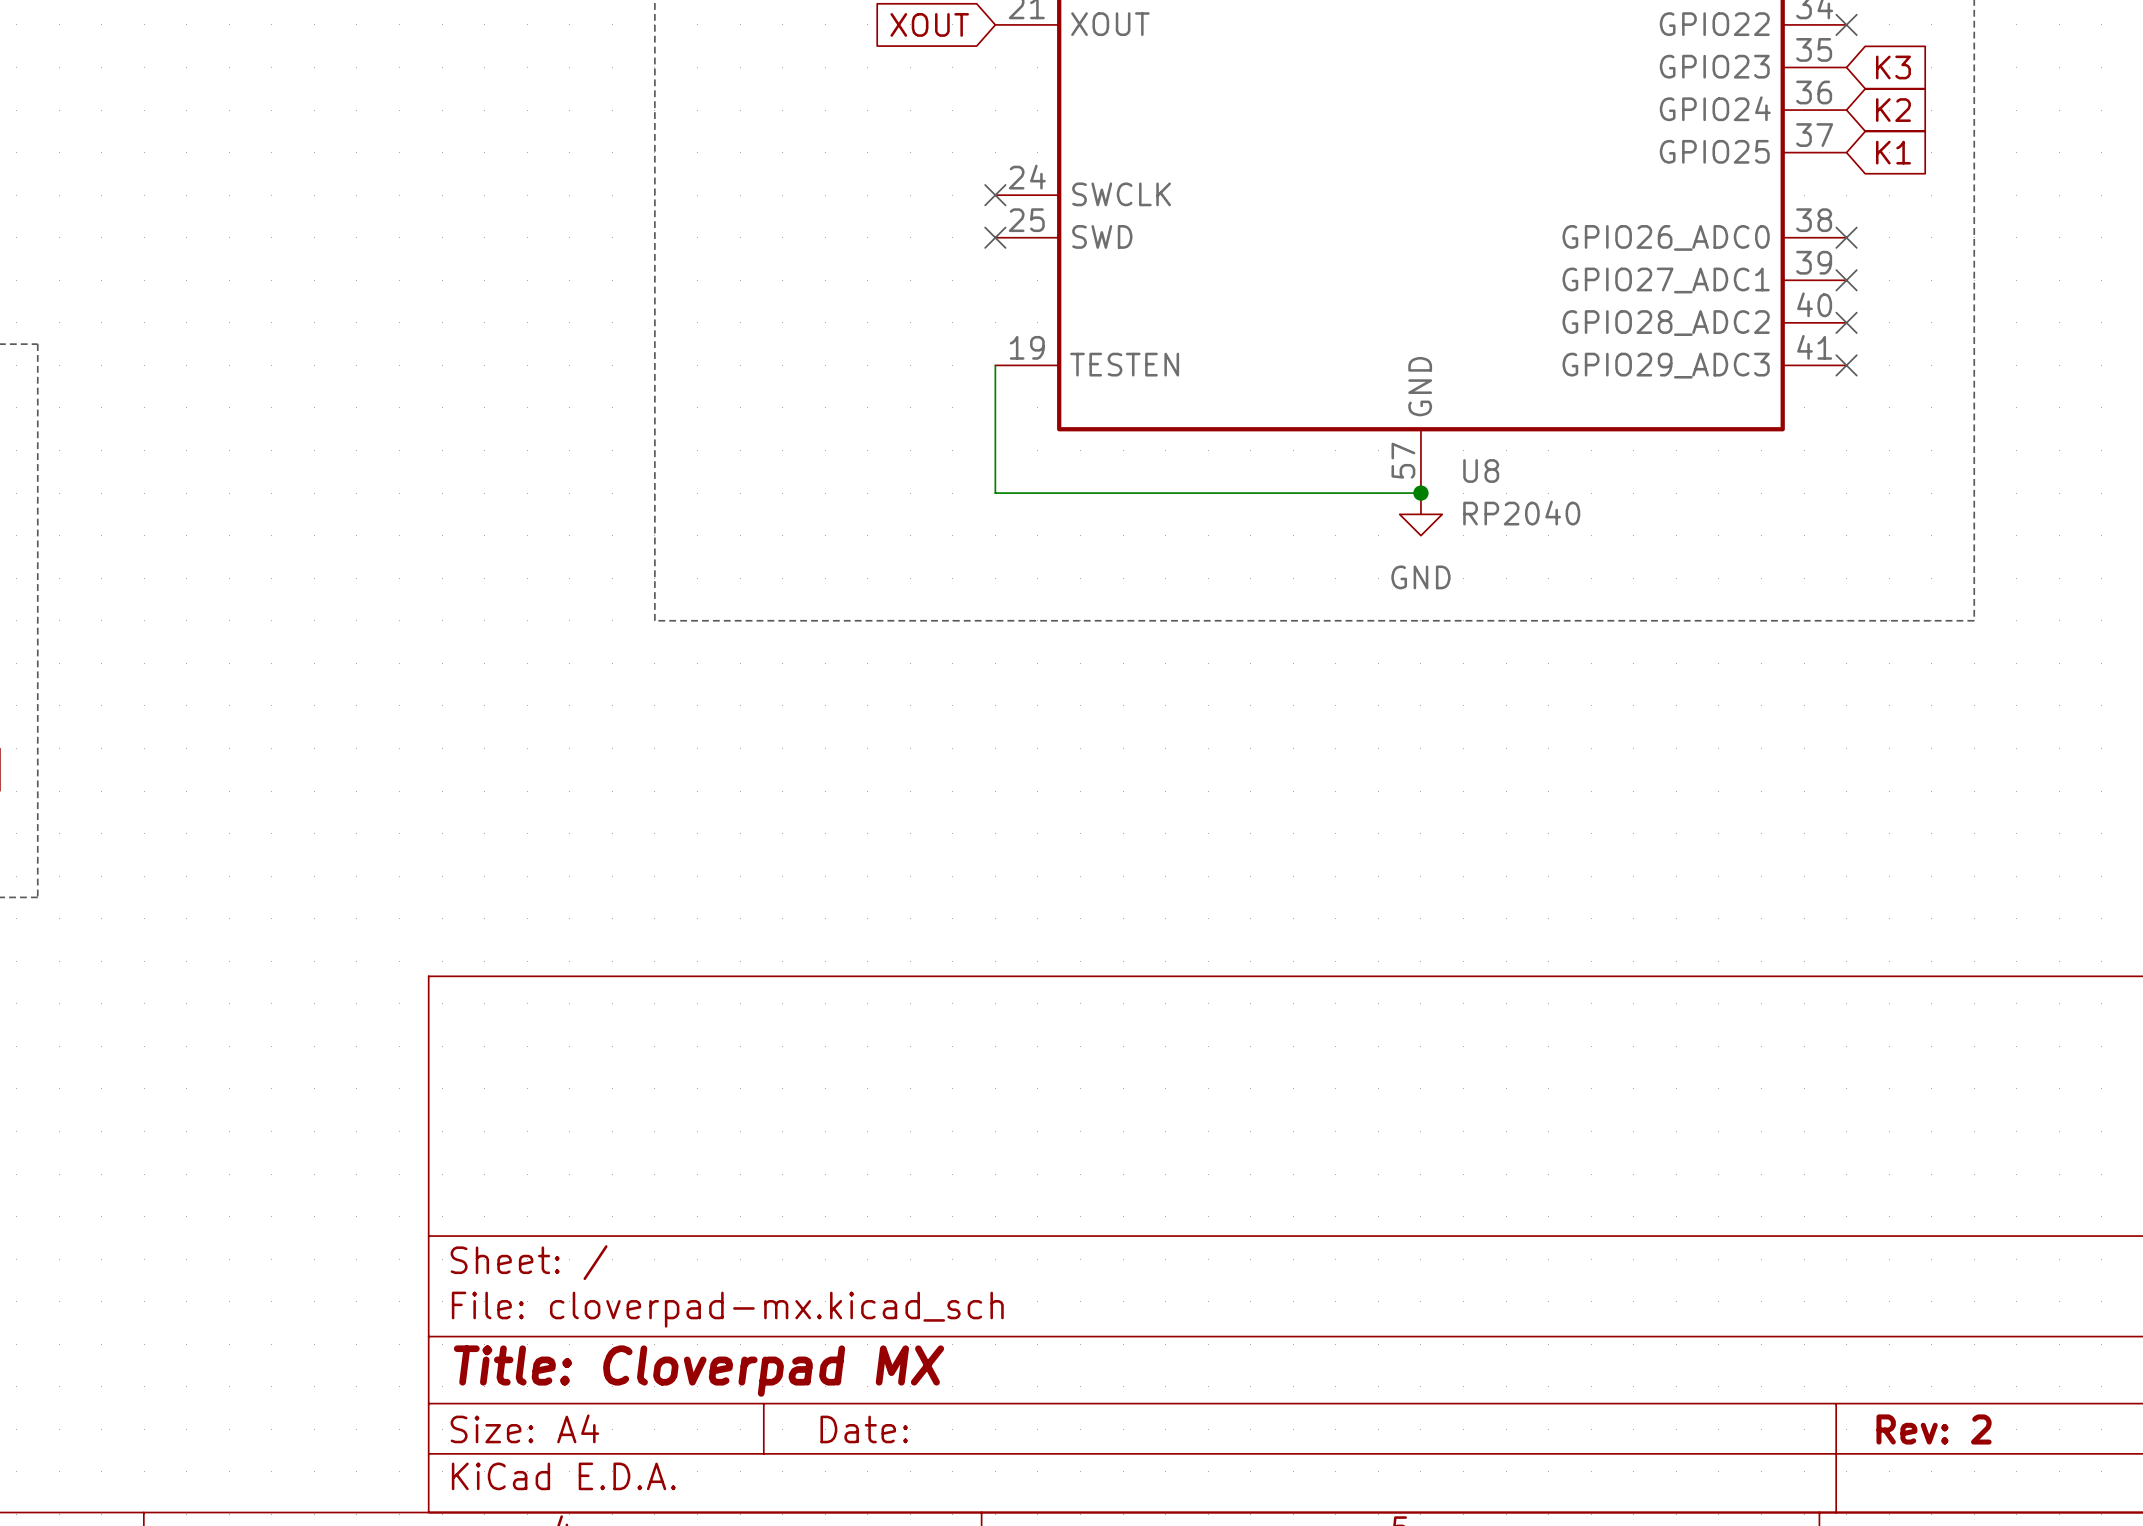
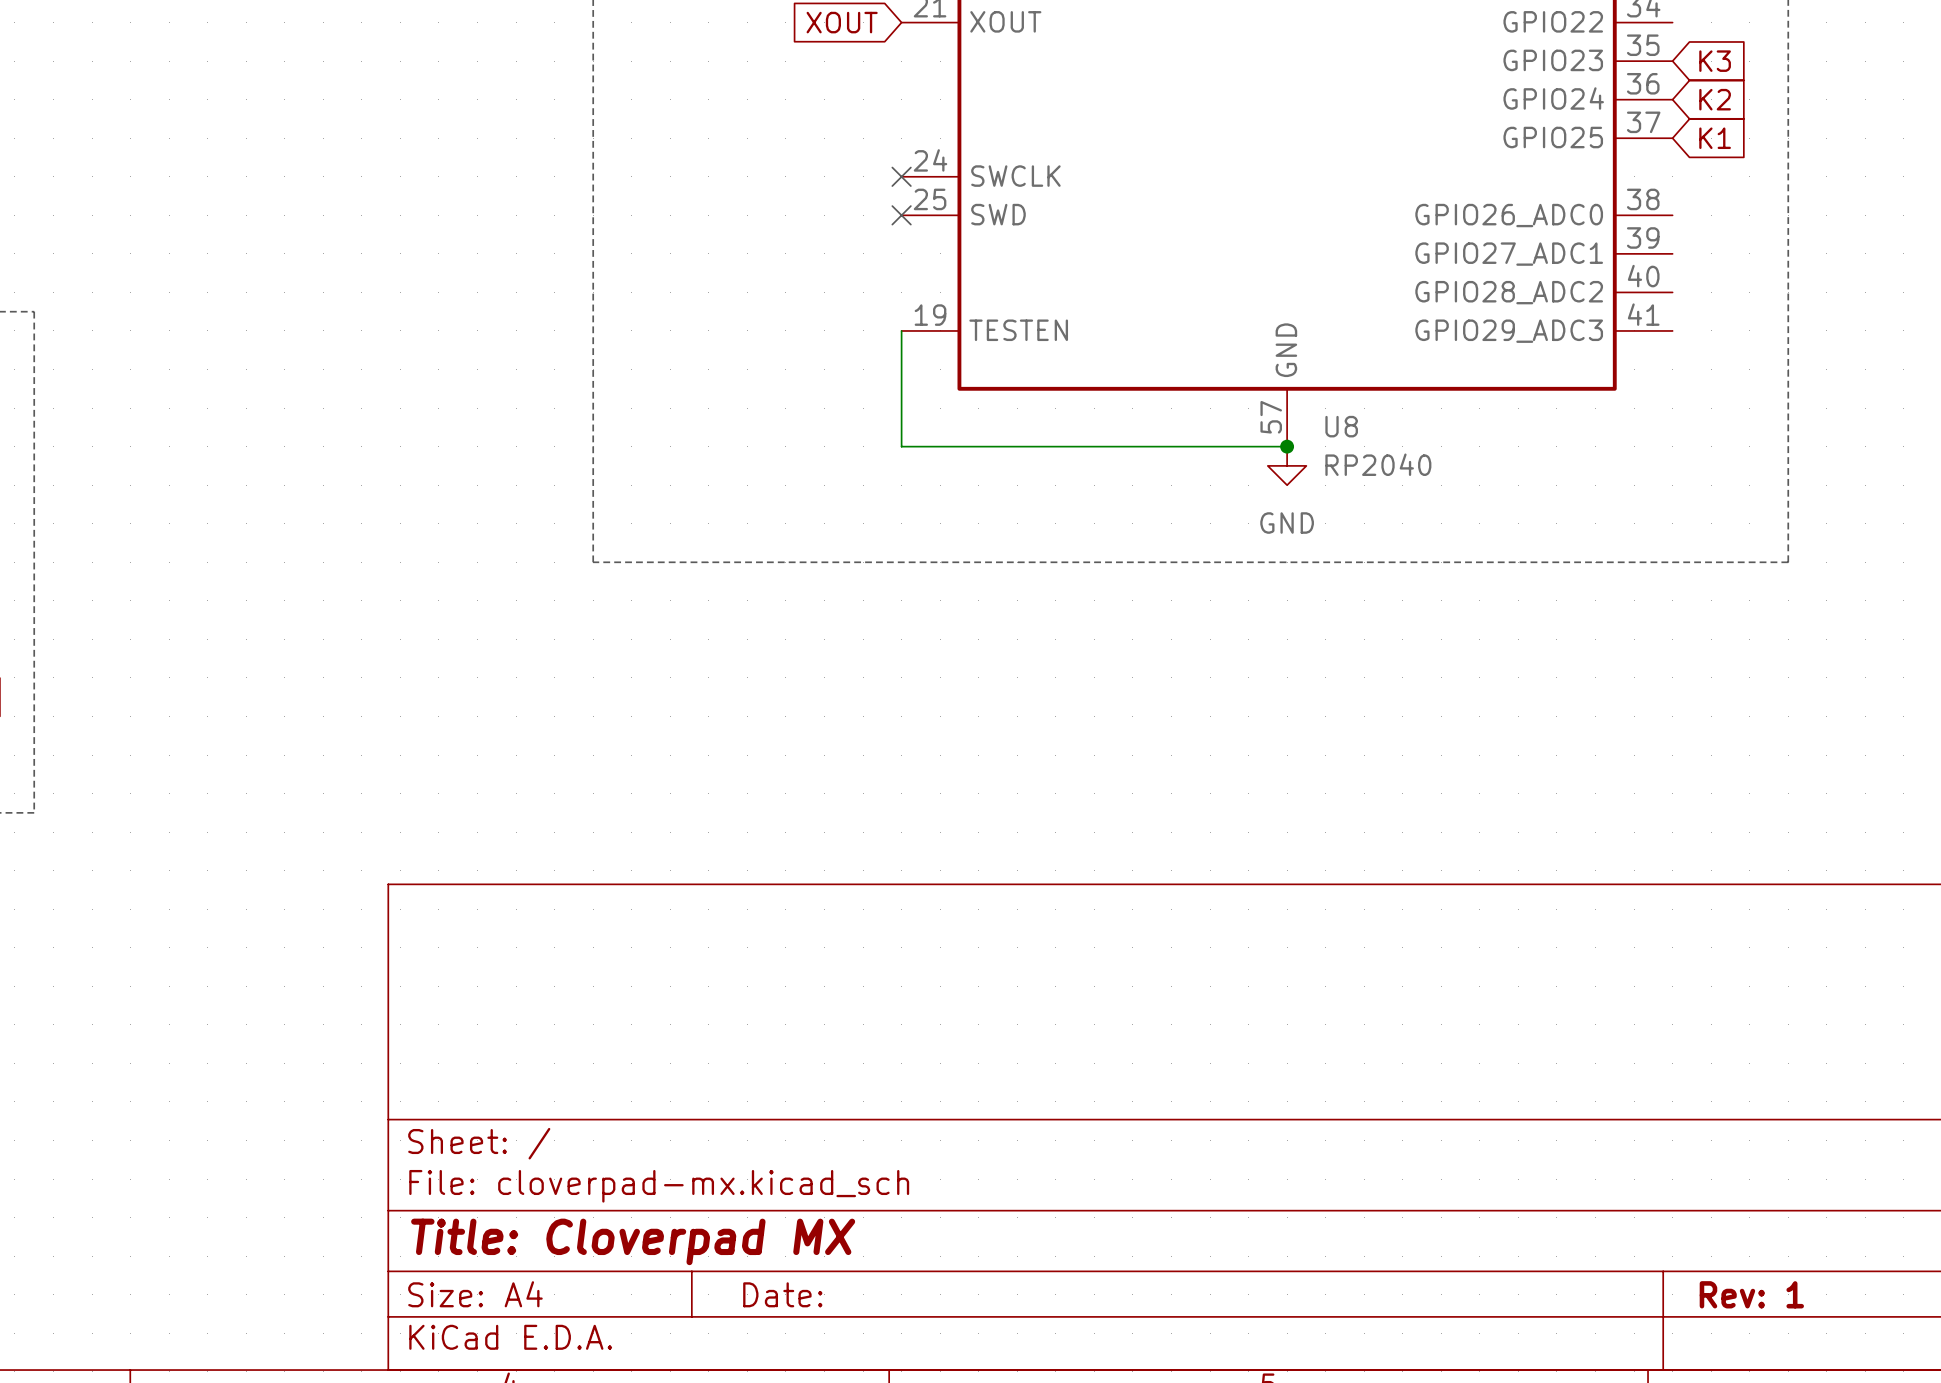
no-connect mark: (1846, 24) -> none
no-connect mark: (1846, 237) -> none
no-connect mark: (1846, 280) -> none
no-connect mark: (1846, 322) -> none
no-connect mark: (1846, 365) -> none
title block: Rev: 2 (1934, 1429) -> Rev: 1 (1751, 1294)

